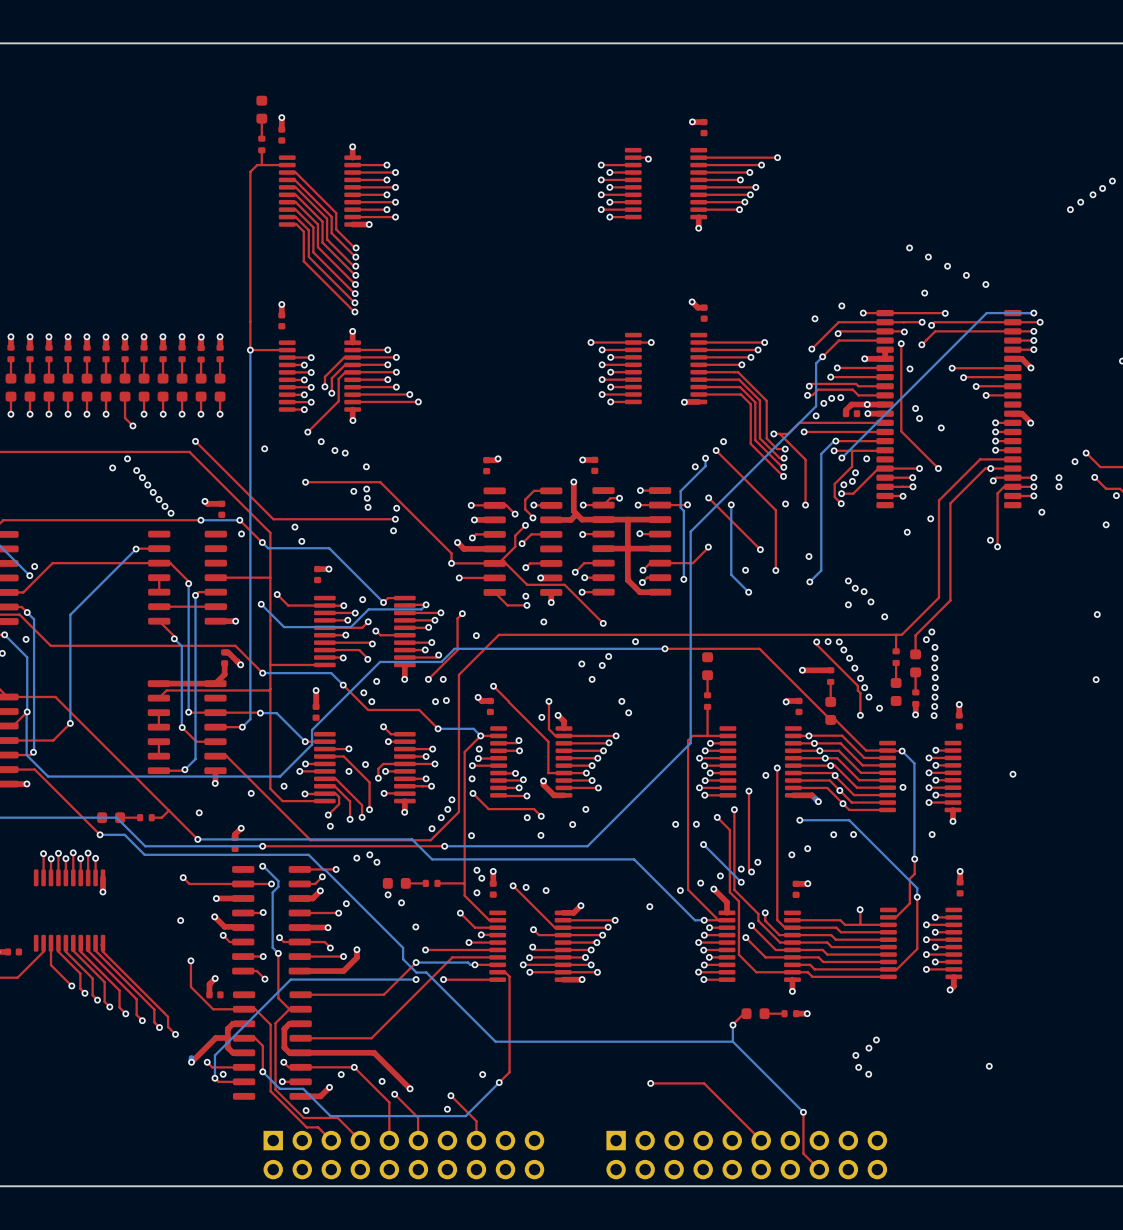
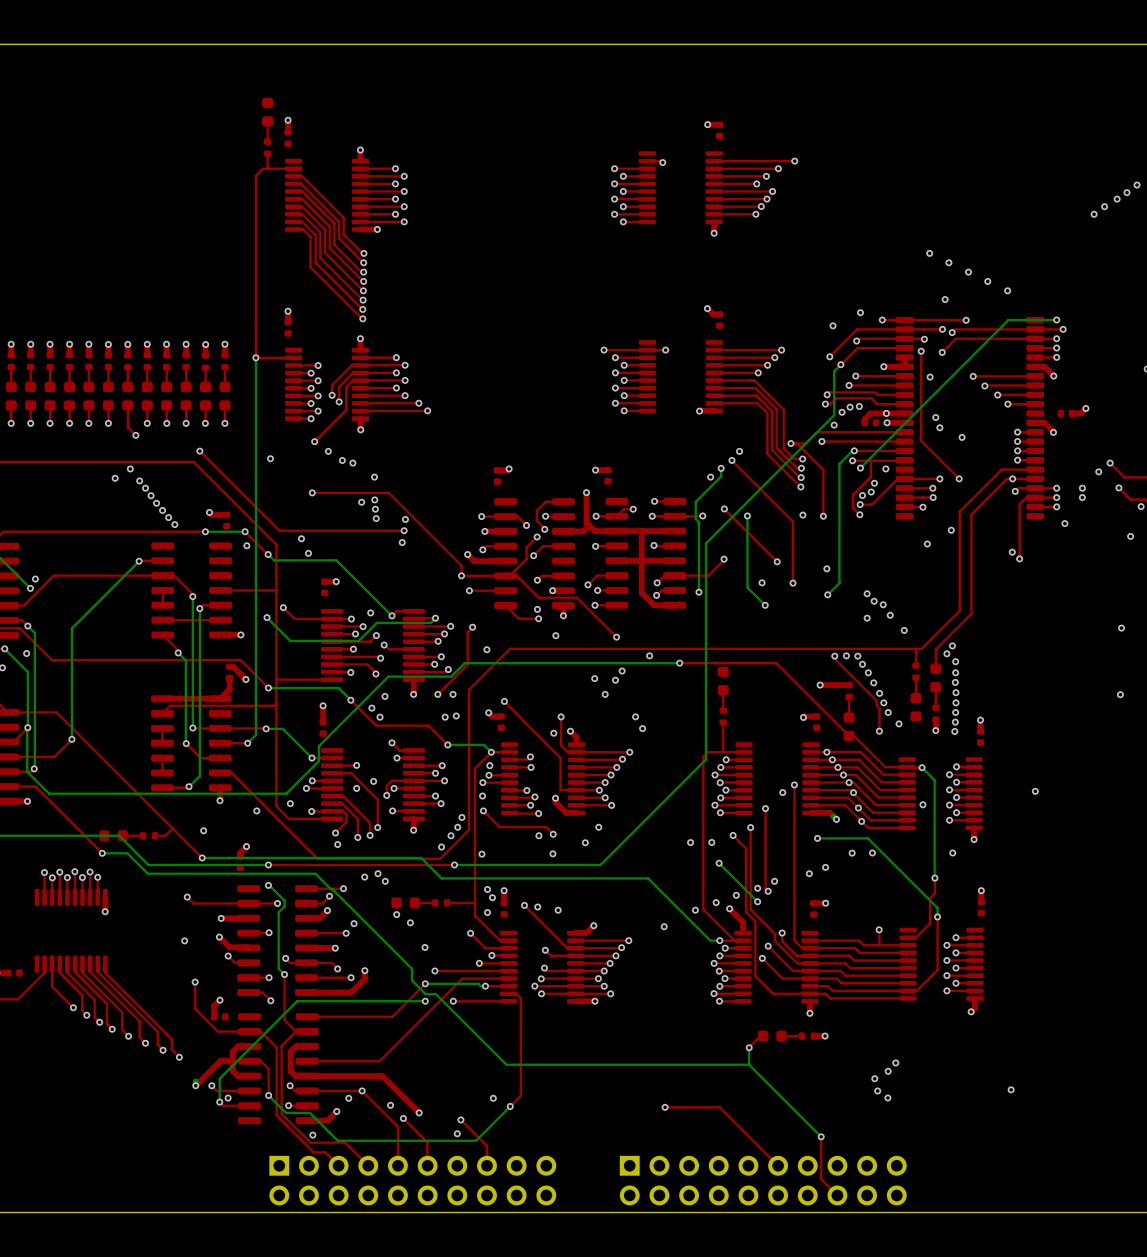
top track: none -> (1085, 408) (1080, 413) (1072, 413)
via: none -> (1085, 408)
part: none -> (1066, 413)

